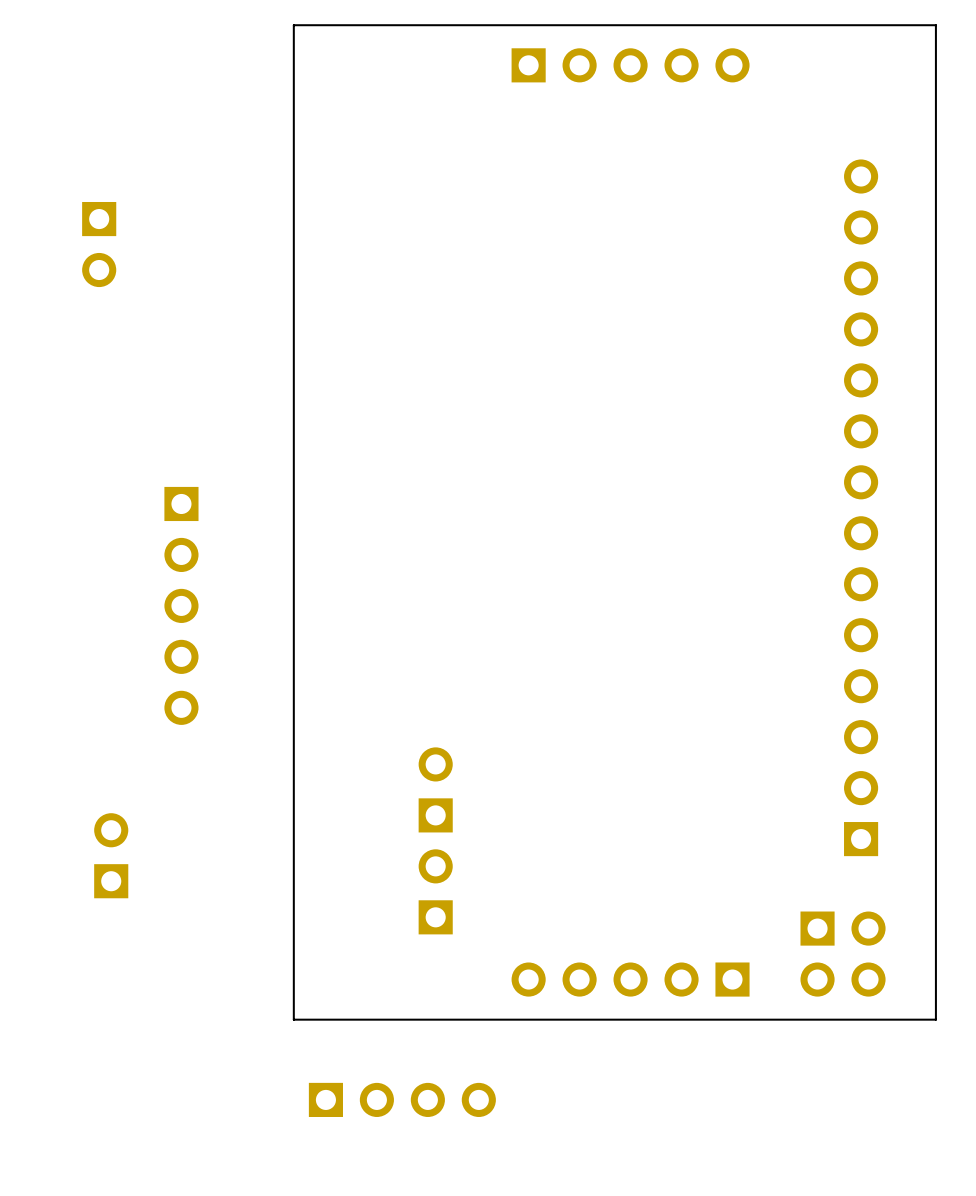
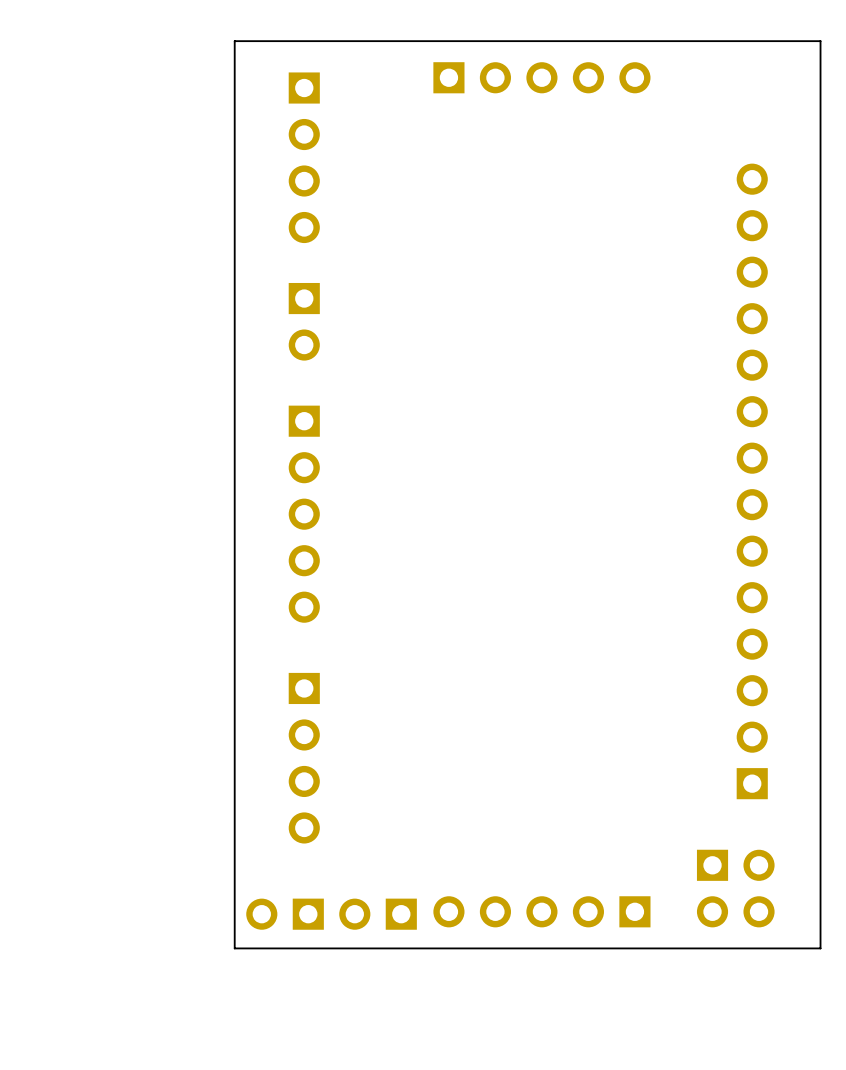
part: none -> (304, 157)
part: (99, 244) -> none
part: none -> (304, 321)
part position: (181, 605) -> (304, 514)
part: (435, 789) -> none
part: (111, 855) -> none
part: (435, 891) -> none
part: none -> (285, 914)
part: none -> (378, 914)
part rotation: 0° (402, 1099) -> 90° clockwise (304, 758)
part position: (402, 1099) -> (304, 758)

